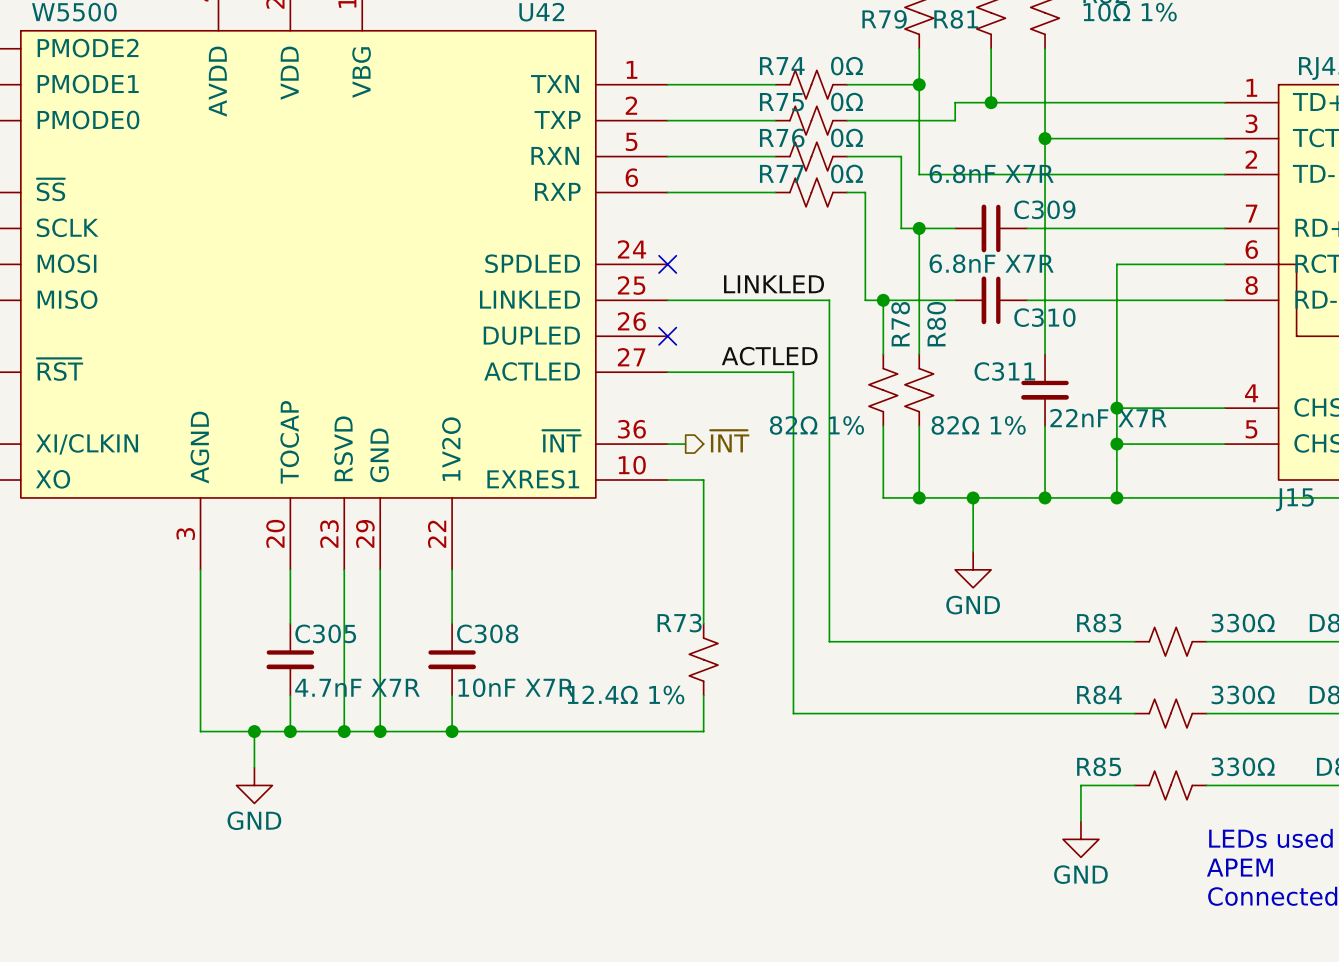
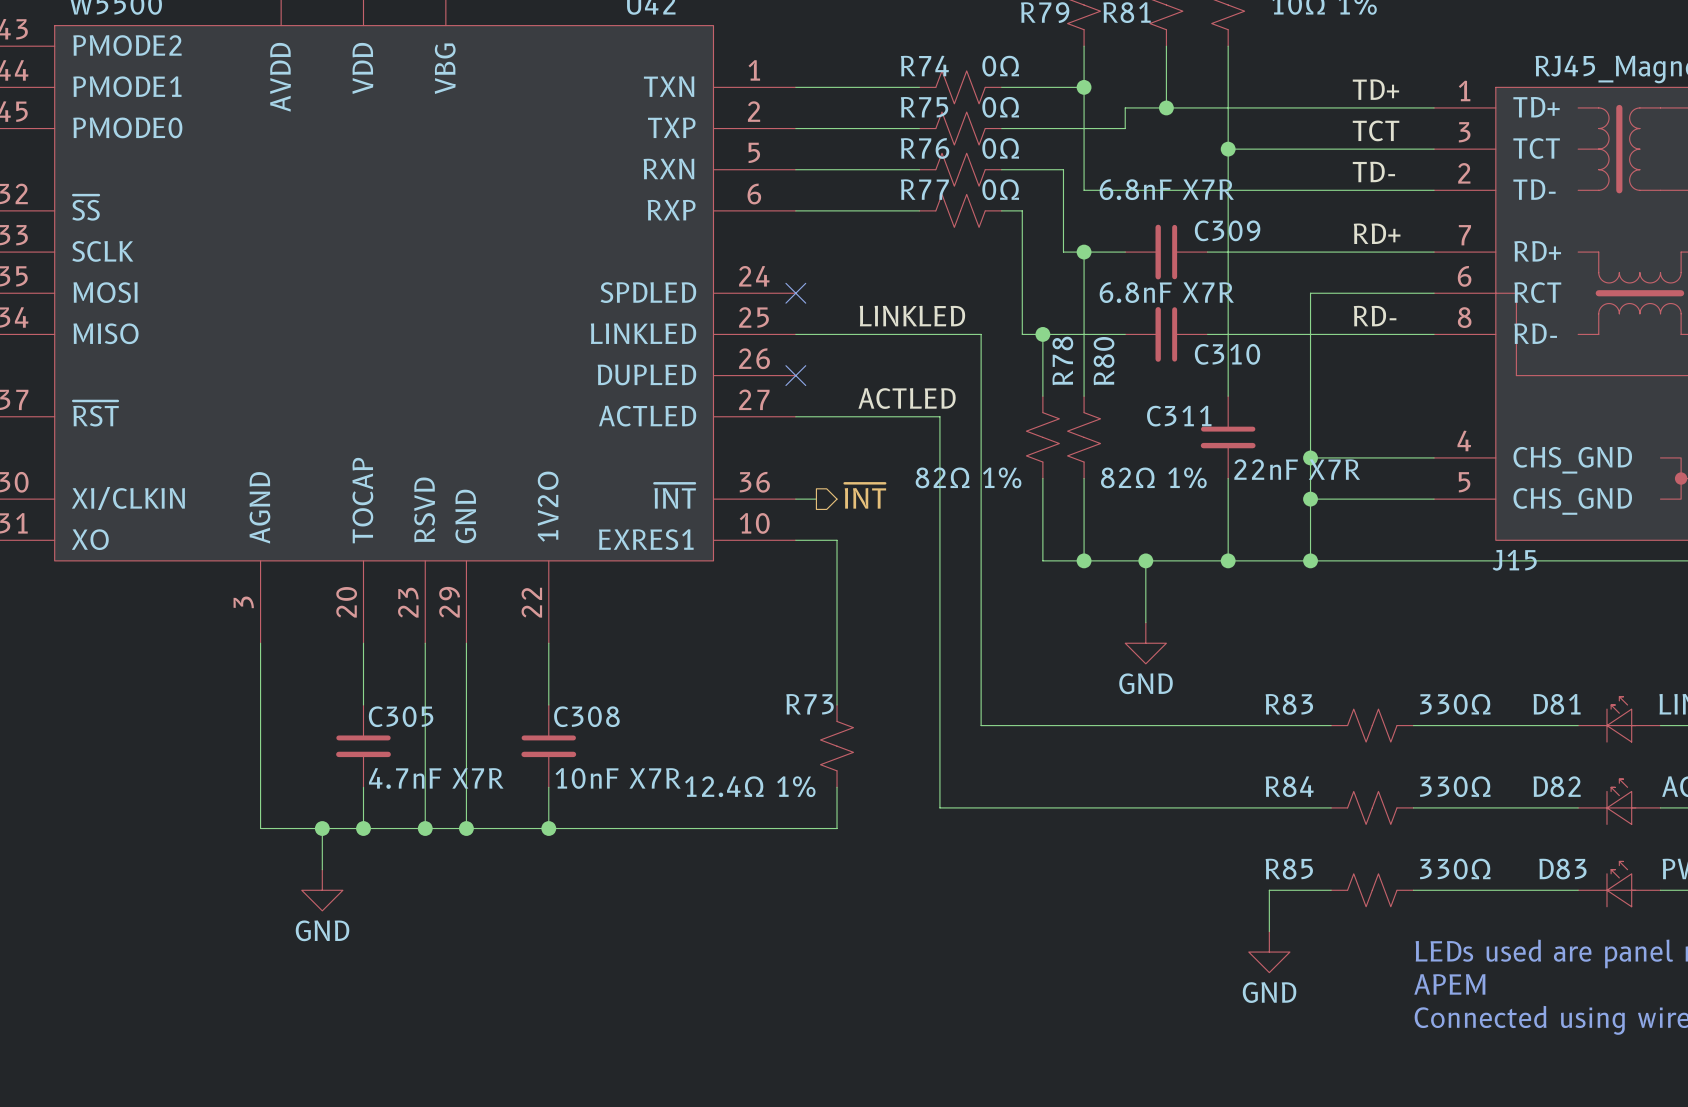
label: none -> TD+ (1375, 89)
label: none -> TCT (1376, 130)
label: none -> TD- (1373, 172)
label: none -> RD+ (1377, 233)
label: none -> RD- (1375, 316)

